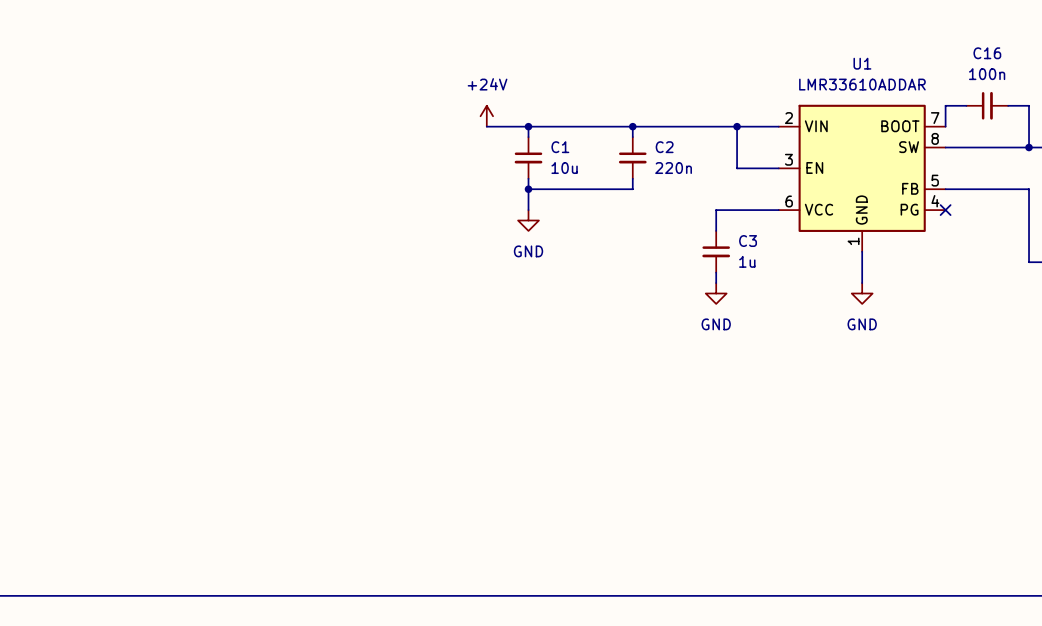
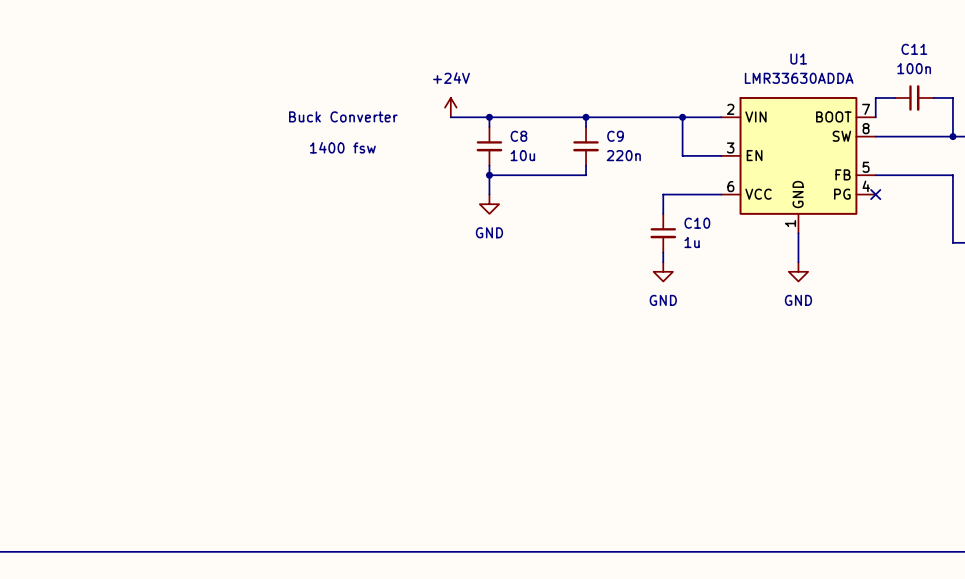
C16 name: C16 (987, 53) -> C11 (914, 49)
U1 value: LMR33610ADDAR (862, 84) -> LMR33630ADDA (799, 78)
text: none -> Buck Converter (343, 116)
C1 name: C1 (560, 147) -> C8 (518, 136)
C2 name: C2 (664, 147) -> C9 (615, 136)
text: none -> 1400 fsw (342, 147)
C3 name: C3 (748, 241) -> C10 (697, 223)

